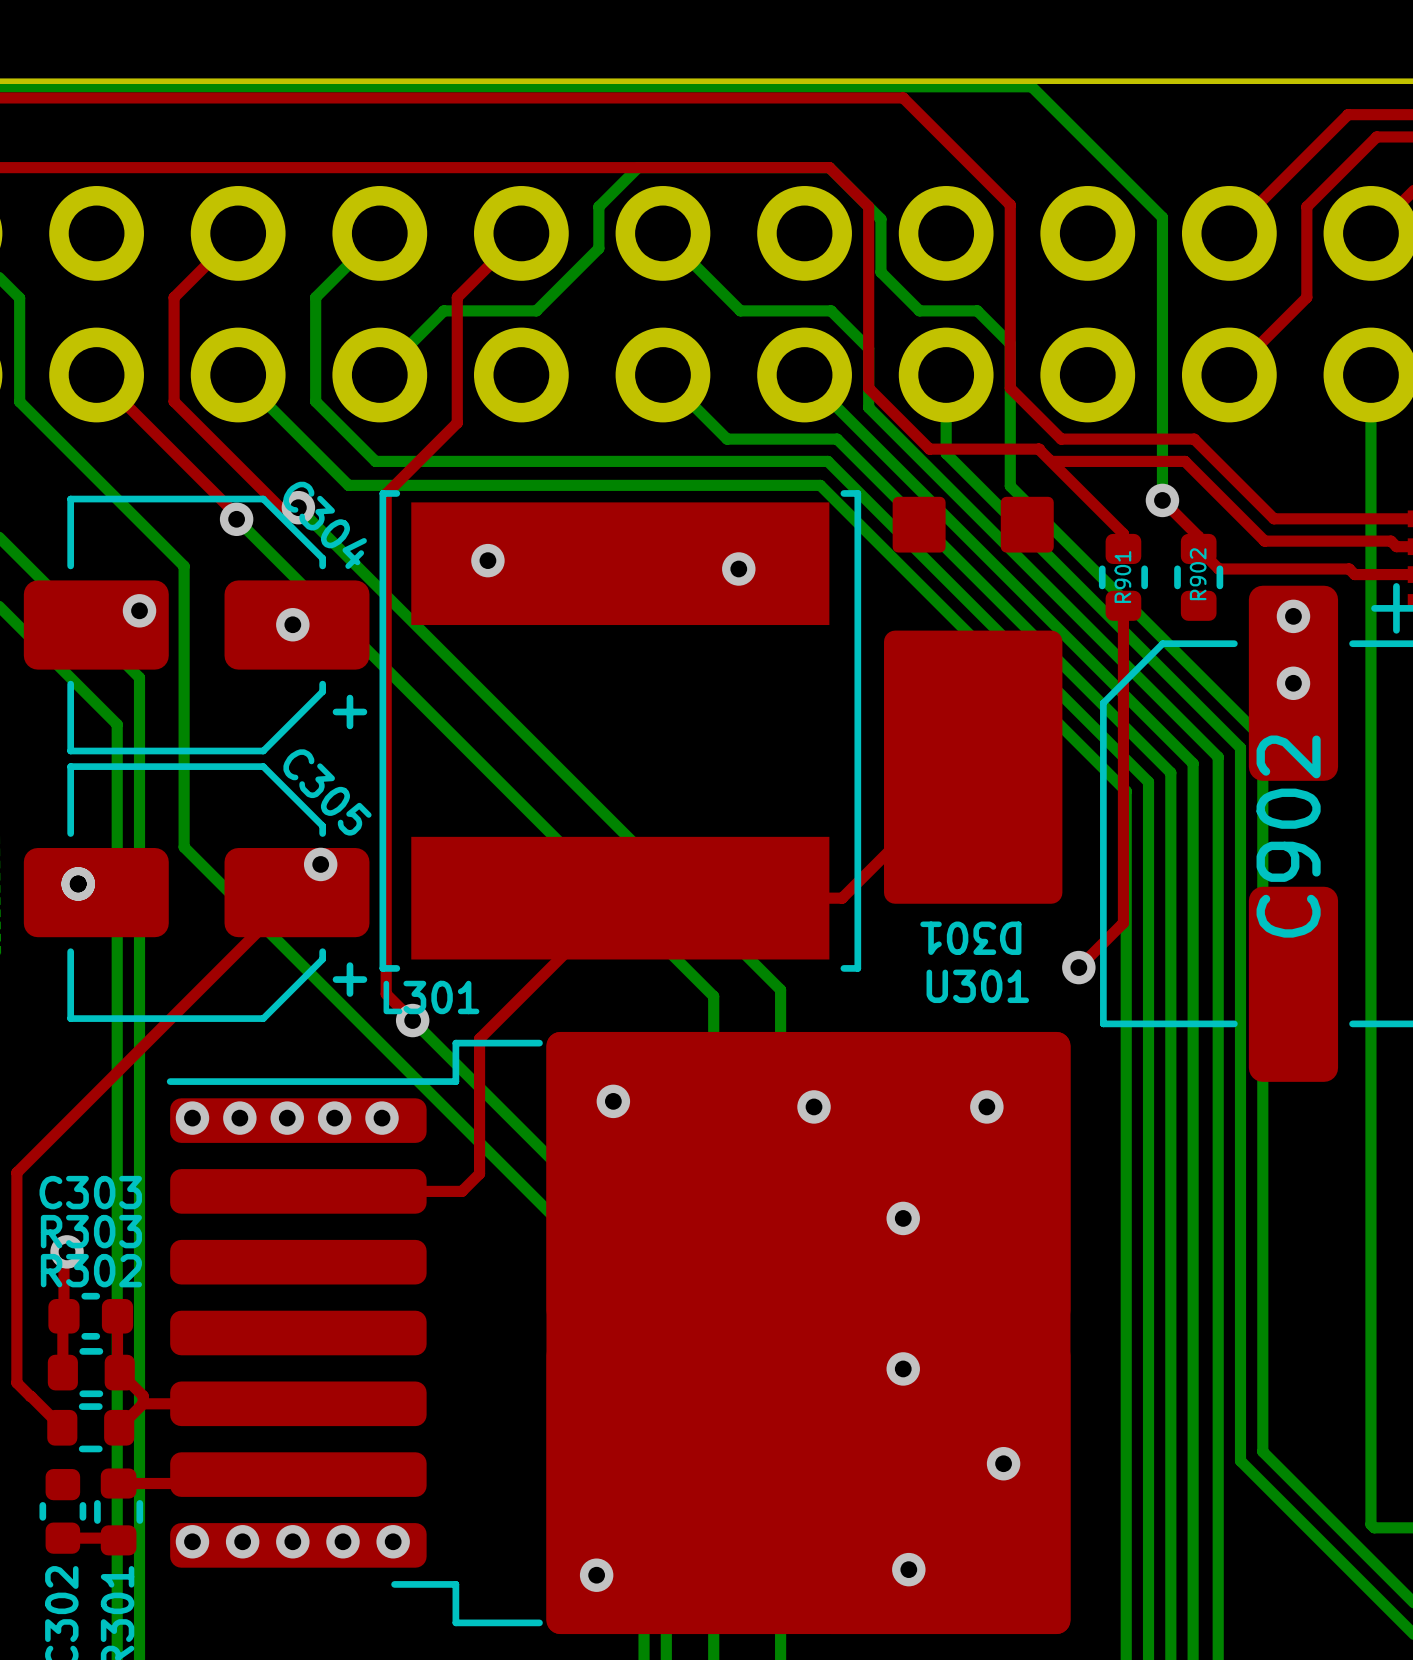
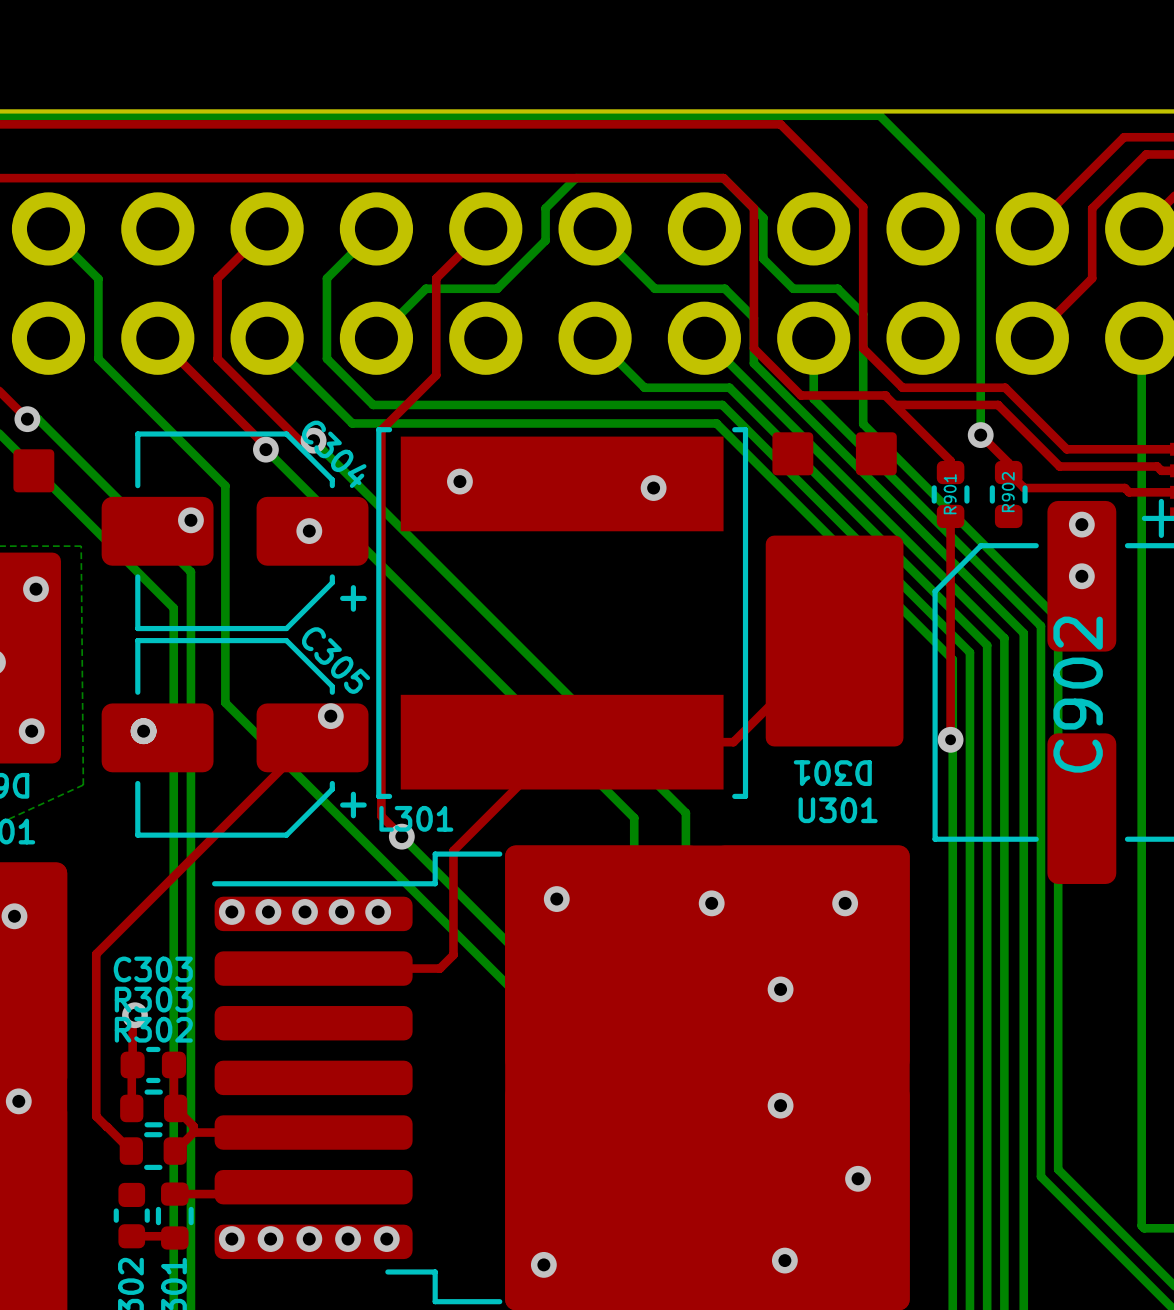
via: none -> (143, 731)
top track: (1123, 895) (1123, 922) (1078, 967) -> none
via: none -> (950, 739)
via: (1078, 967) -> none

